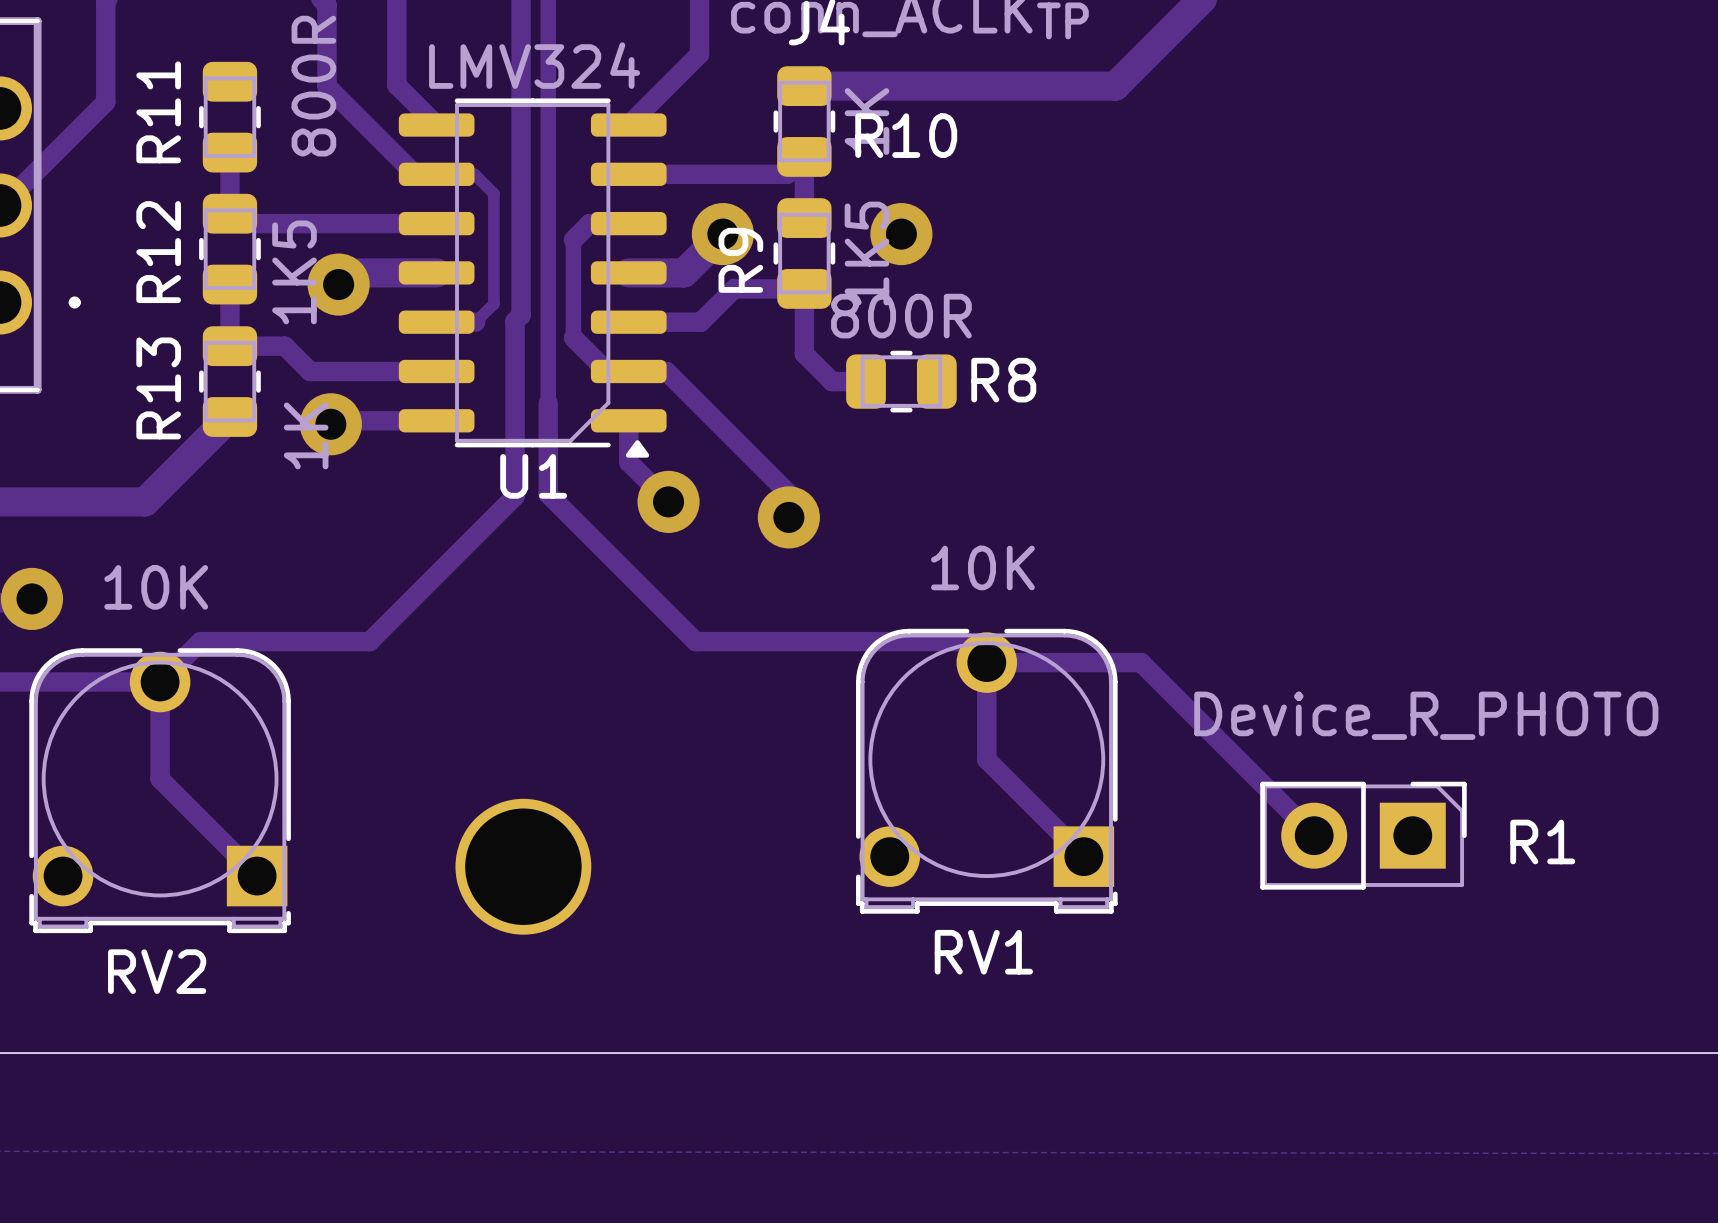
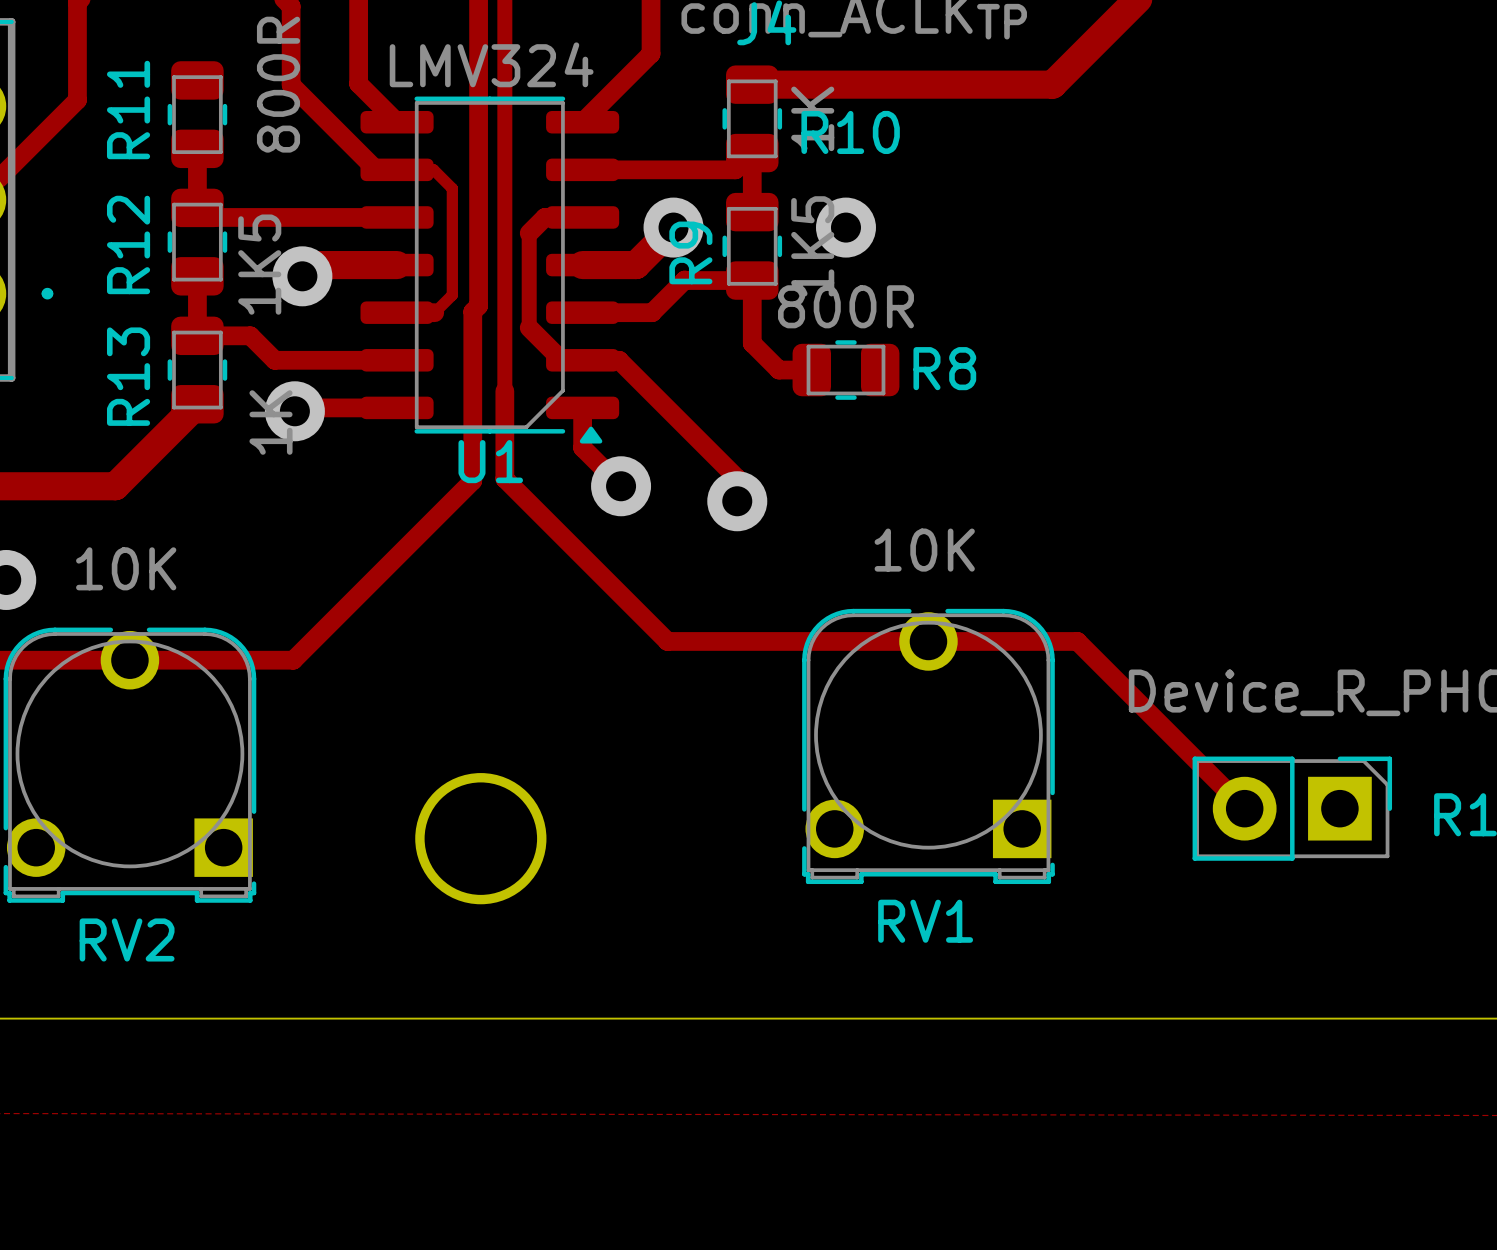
track: (369, 641) (200, 641) (160, 681) (160, 779) (257, 876) -> (332, 621) (293, 660) (129, 660)
track: (695, 641) (965, 641) (986, 662) (986, 759) (1083, 856) -> (647, 621) (667, 641) (928, 641)

